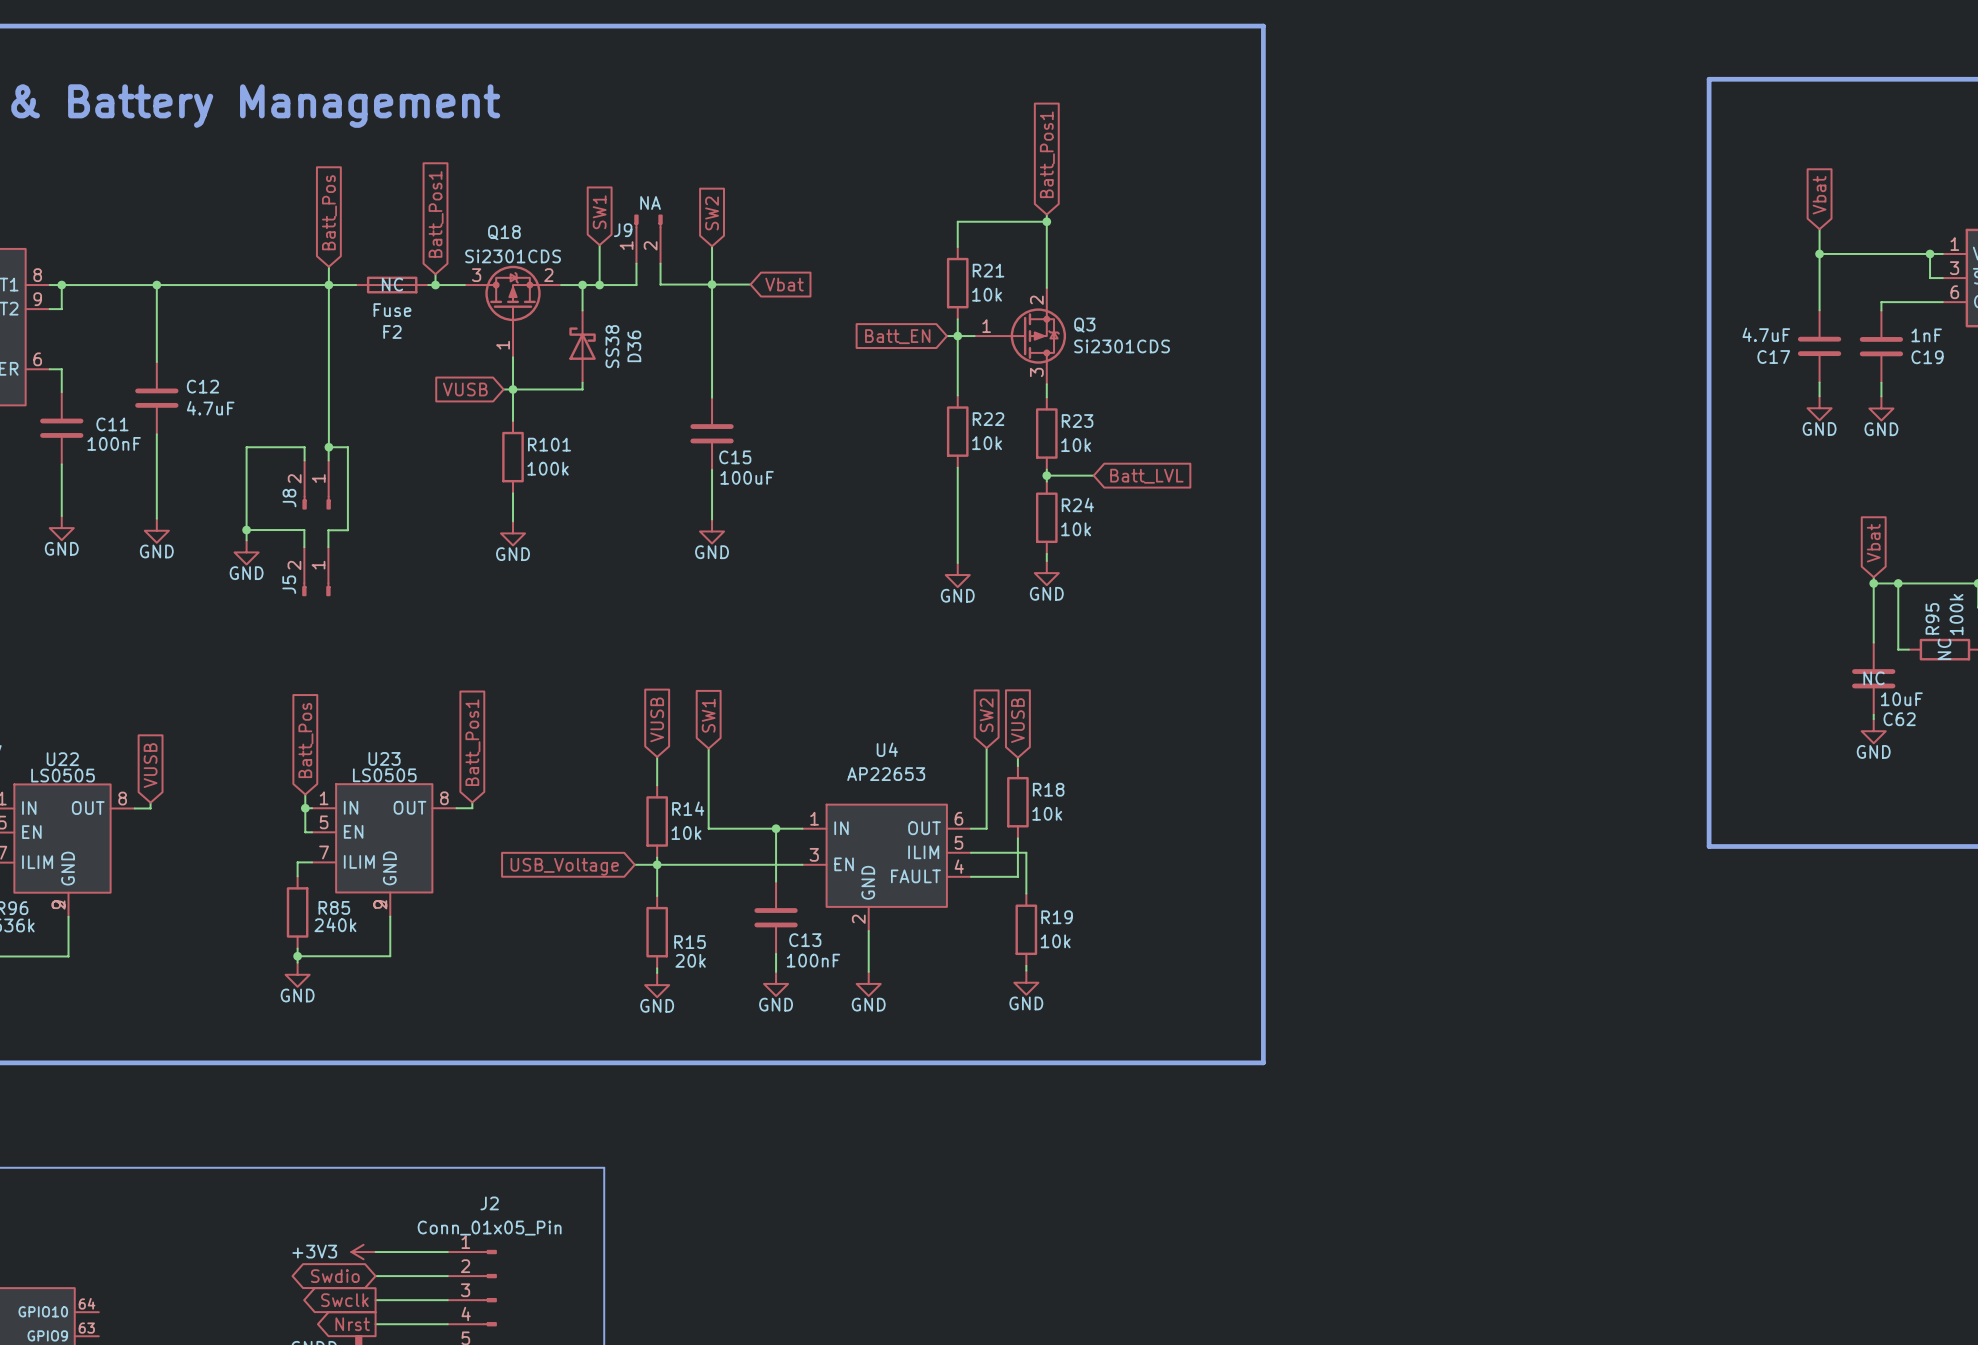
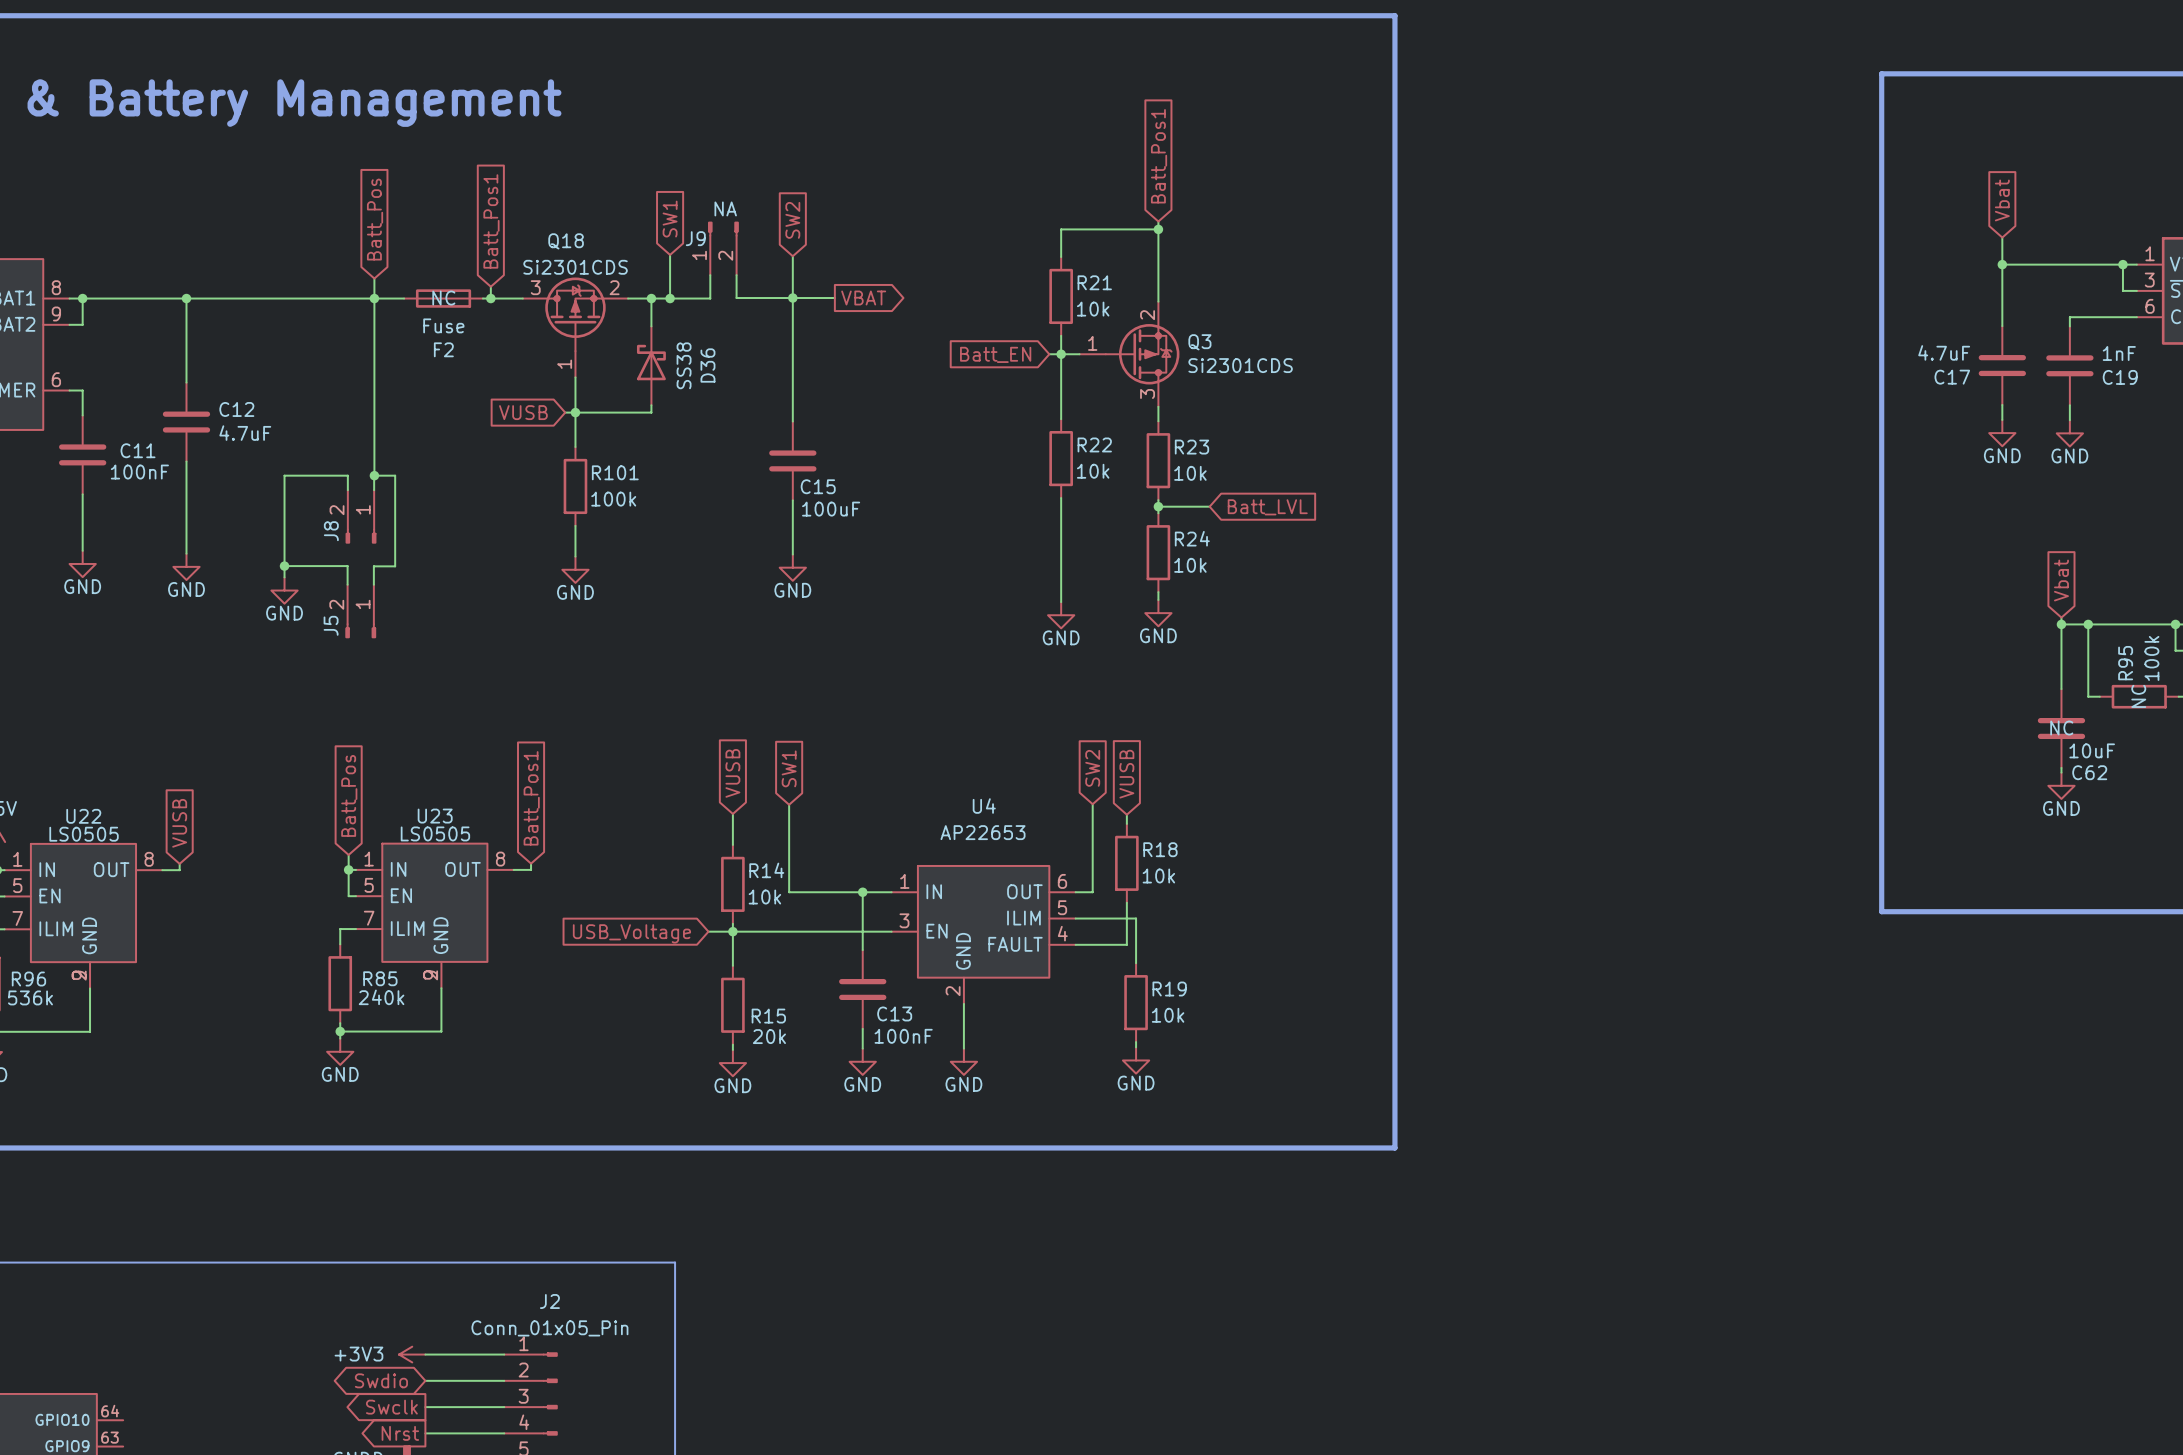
global label shape: input (784, 284) -> output (863, 298)
global label: Vbat (784, 284) -> VBAT (863, 298)

